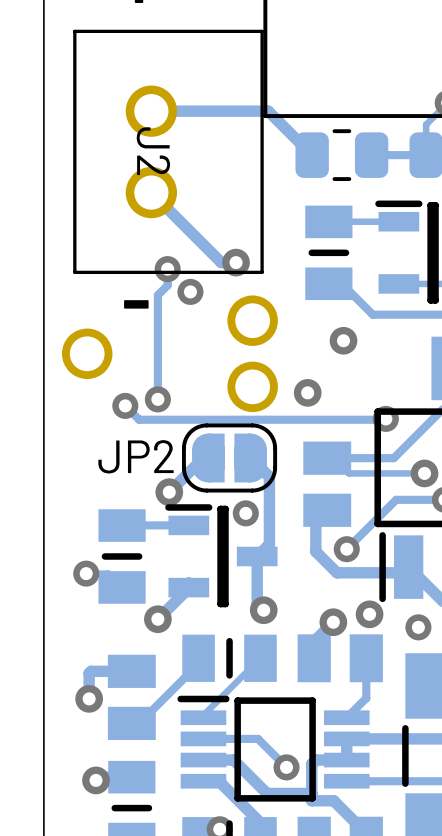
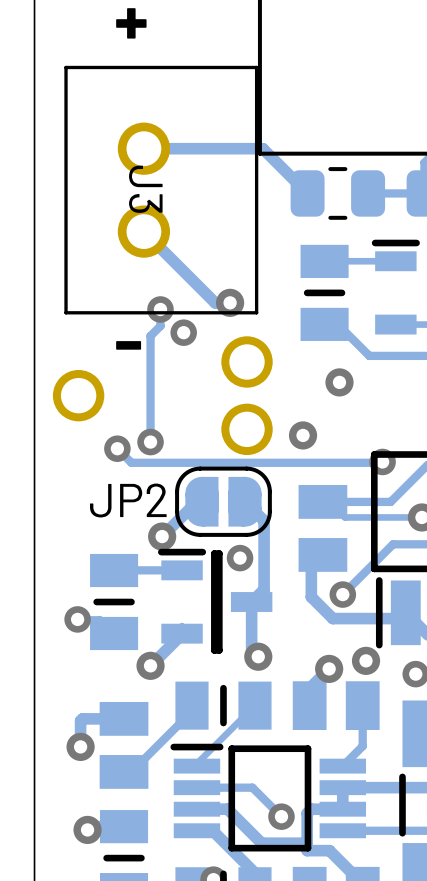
J2 name: J2 (153, 151) -> J3 (145, 189)

